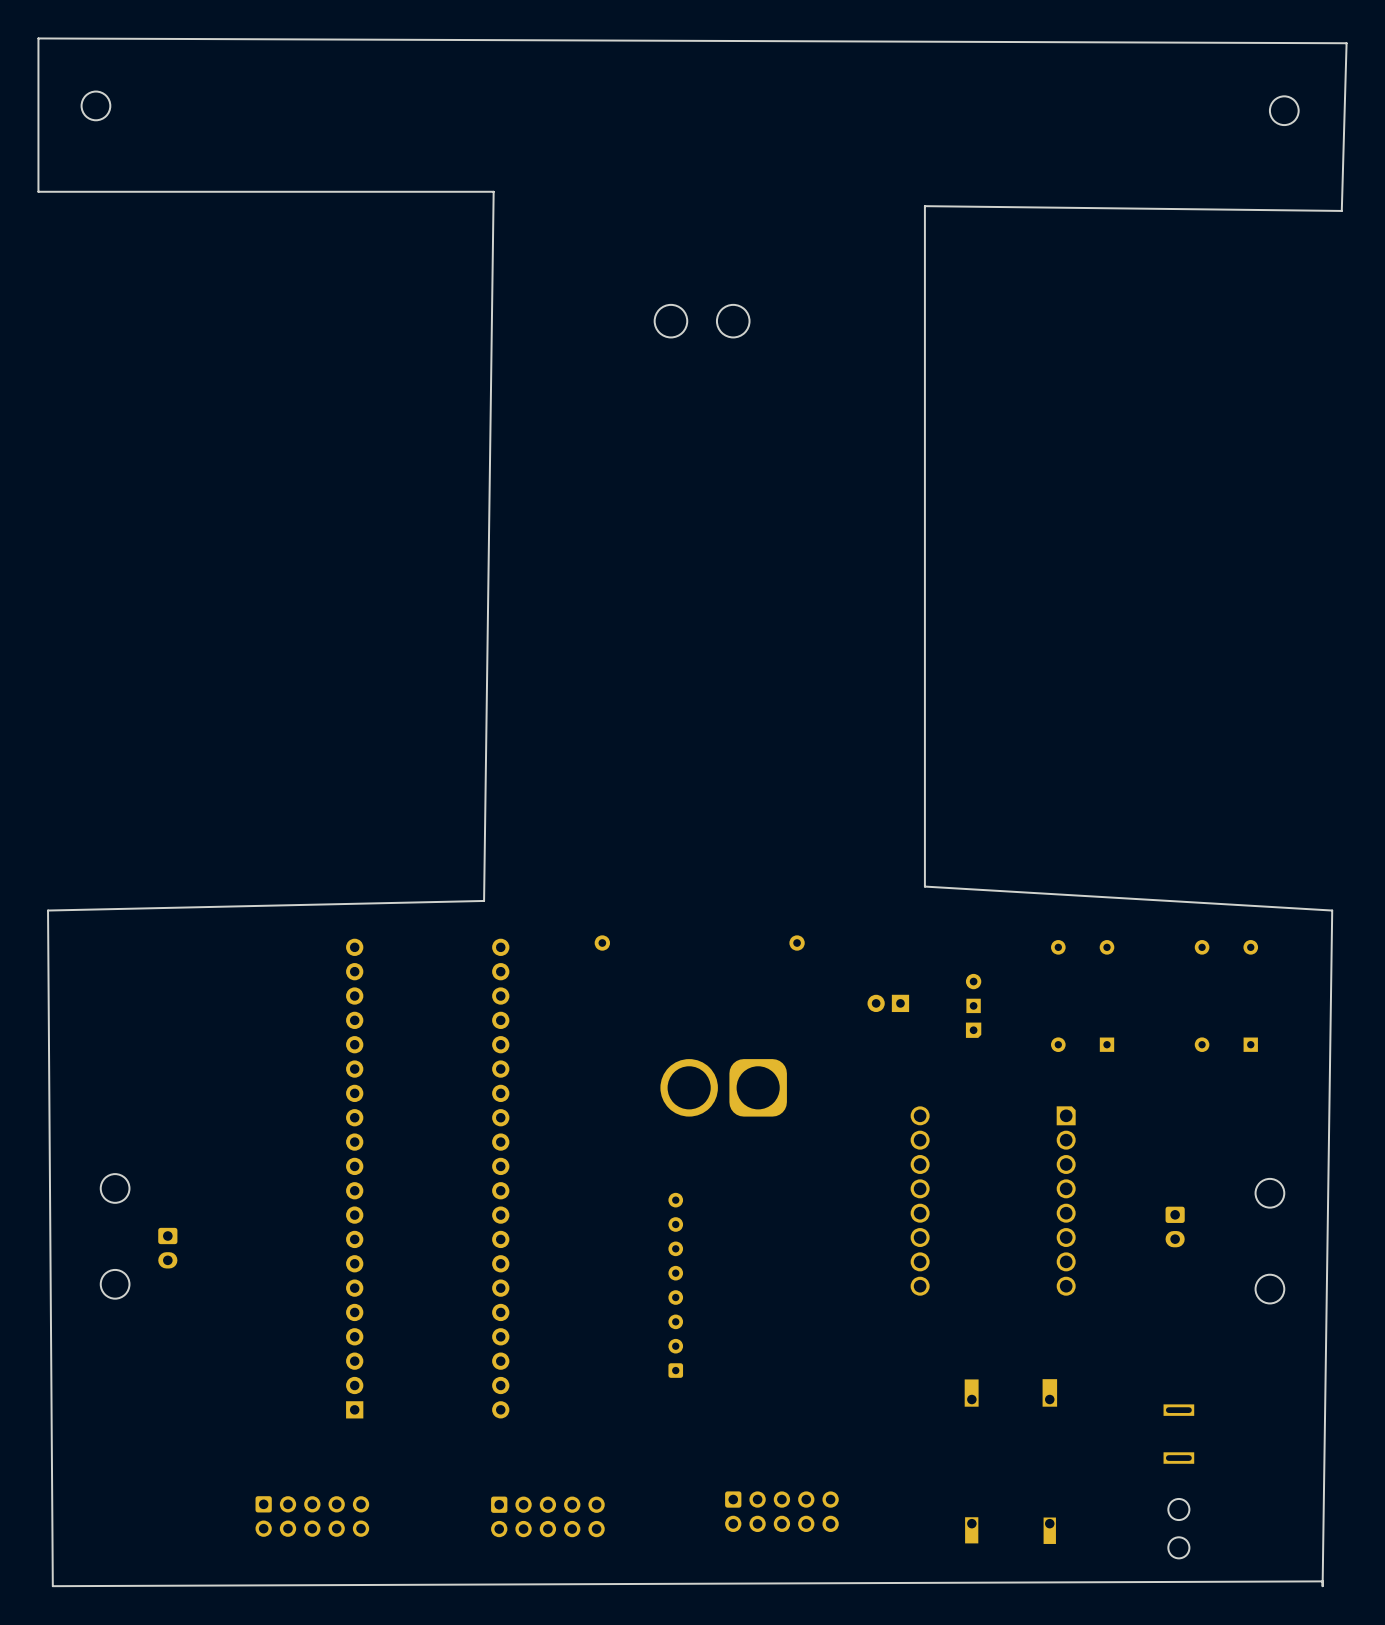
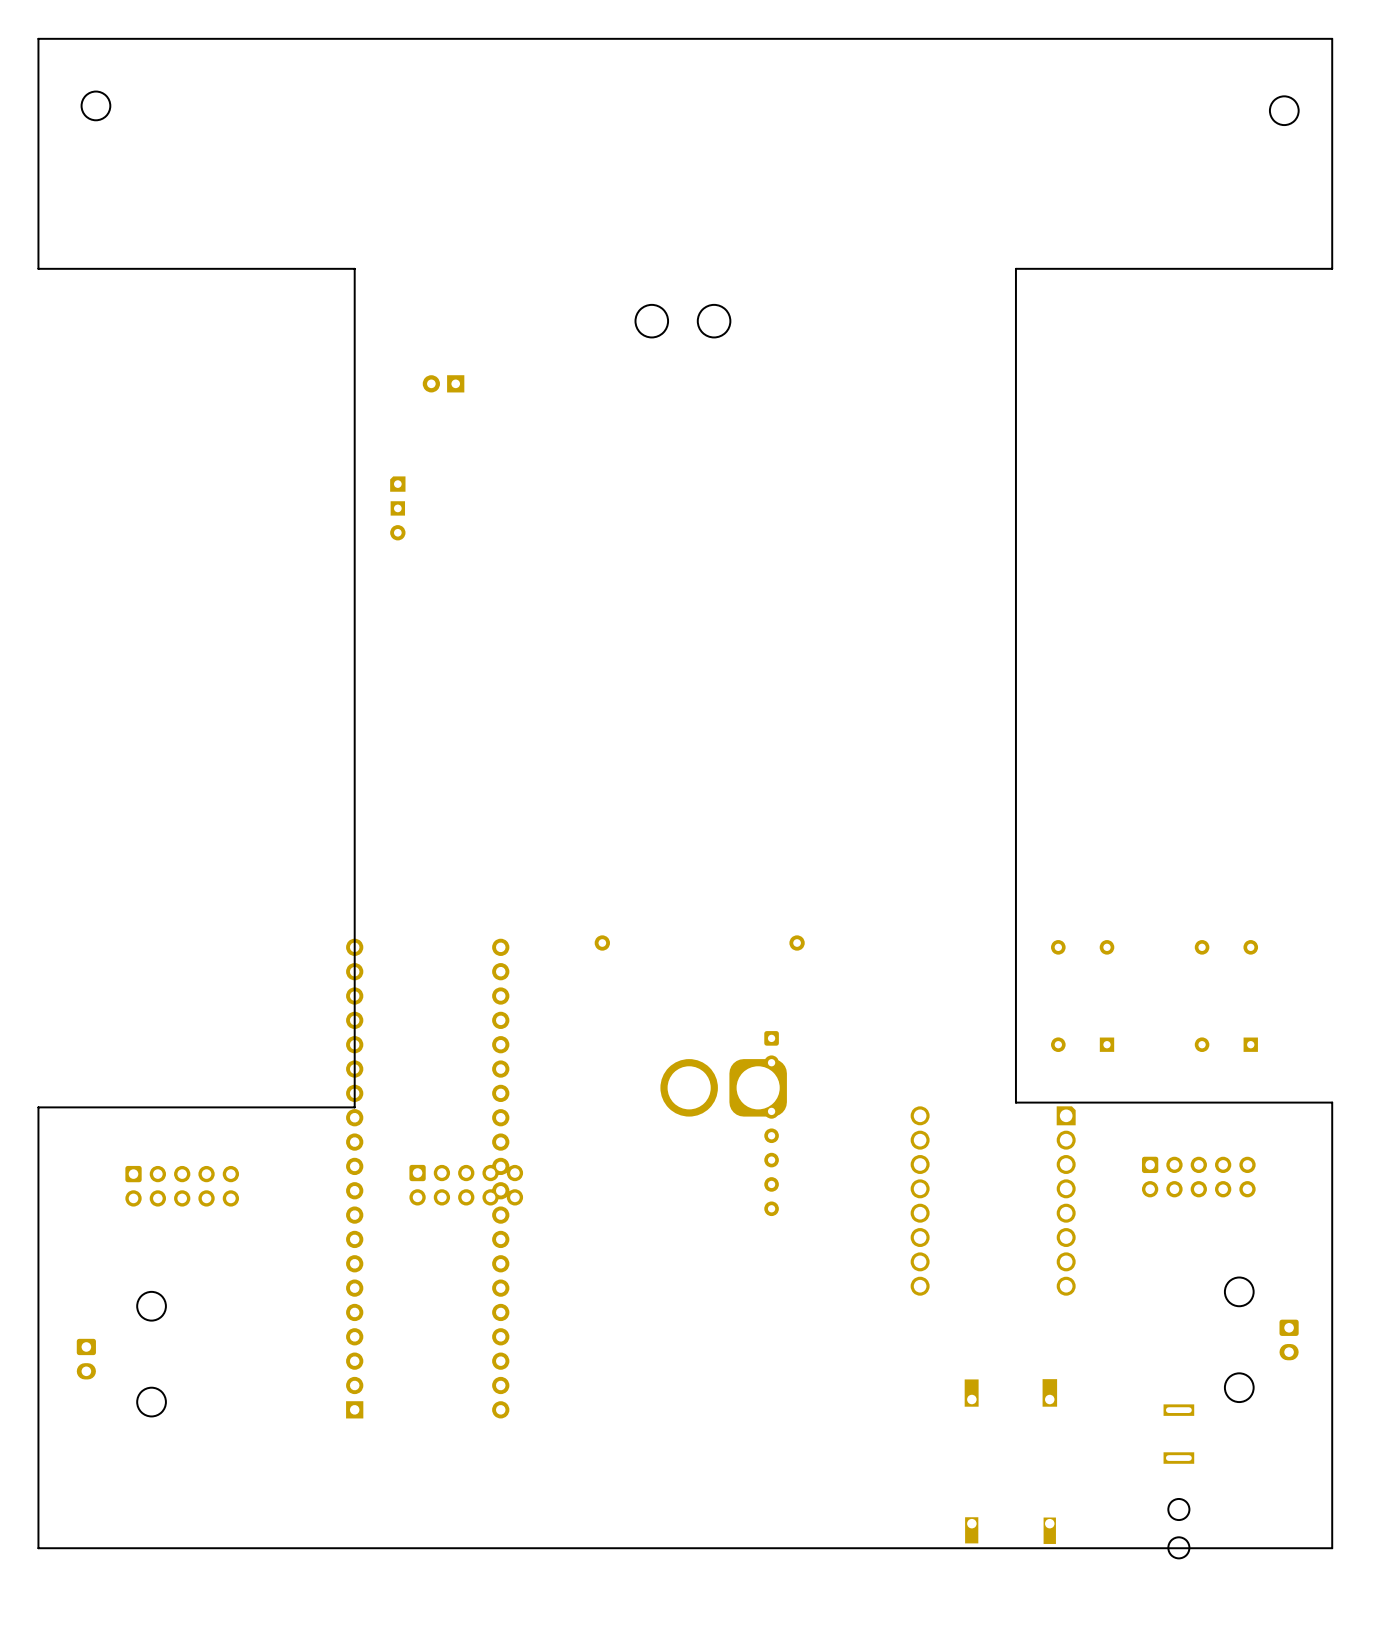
board edge: (38, 38) (1346, 43) (1341, 210) (924, 206) (924, 886) (1332, 910) (1322, 1586) (1322, 1581) (52, 1586) (48, 910) (484, 900) (493, 191) (38, 191) -> (38, 38) (1332, 38) (1332, 268) (1015, 268) (1015, 1102) (1332, 1102) (1332, 1548) (38, 1548) (38, 1107) (354, 1107) (354, 268) (38, 268) (38, 191)
round board edge position: (670, 321) -> (651, 321)
round board edge position: (733, 321) -> (714, 321)
part: none -> (443, 383)
part: none -> (397, 508)
part: (888, 1003) -> none
part: (973, 1005) -> none
round board edge: [100, 1173, 130, 1204] -> none
part: none -> (1198, 1177)
round board edge: [1255, 1178, 1285, 1209] -> none
part: none -> (466, 1185)
part: none -> (182, 1186)
part position: (1175, 1226) -> (1289, 1339)
part position: (167, 1248) -> (86, 1359)
round board edge position: (115, 1284) -> (151, 1306)
part rotation: 0° (675, 1285) -> 180° (771, 1123)
part position: (675, 1285) -> (771, 1123)
round board edge position: (1269, 1289) -> (1239, 1291)
round board edge: none -> [1224, 1372, 1255, 1403]
round board edge: none -> [136, 1387, 167, 1417]
part: (781, 1511) -> none
part: (312, 1516) -> none
part: (547, 1516) -> none

